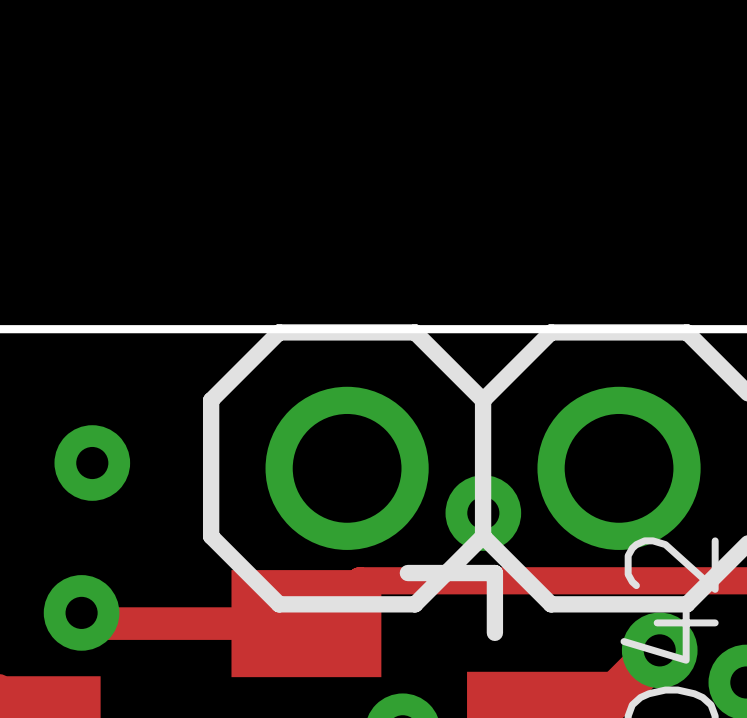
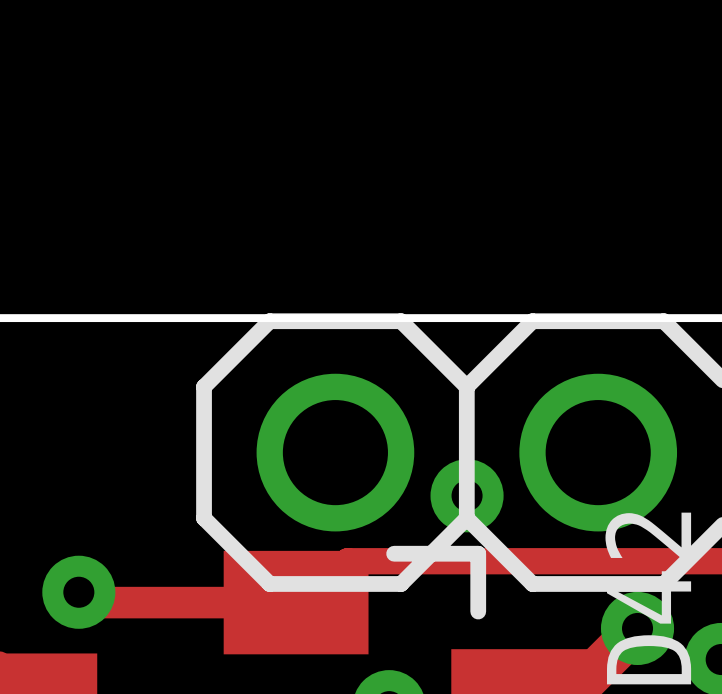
via: (92, 463) -> none

